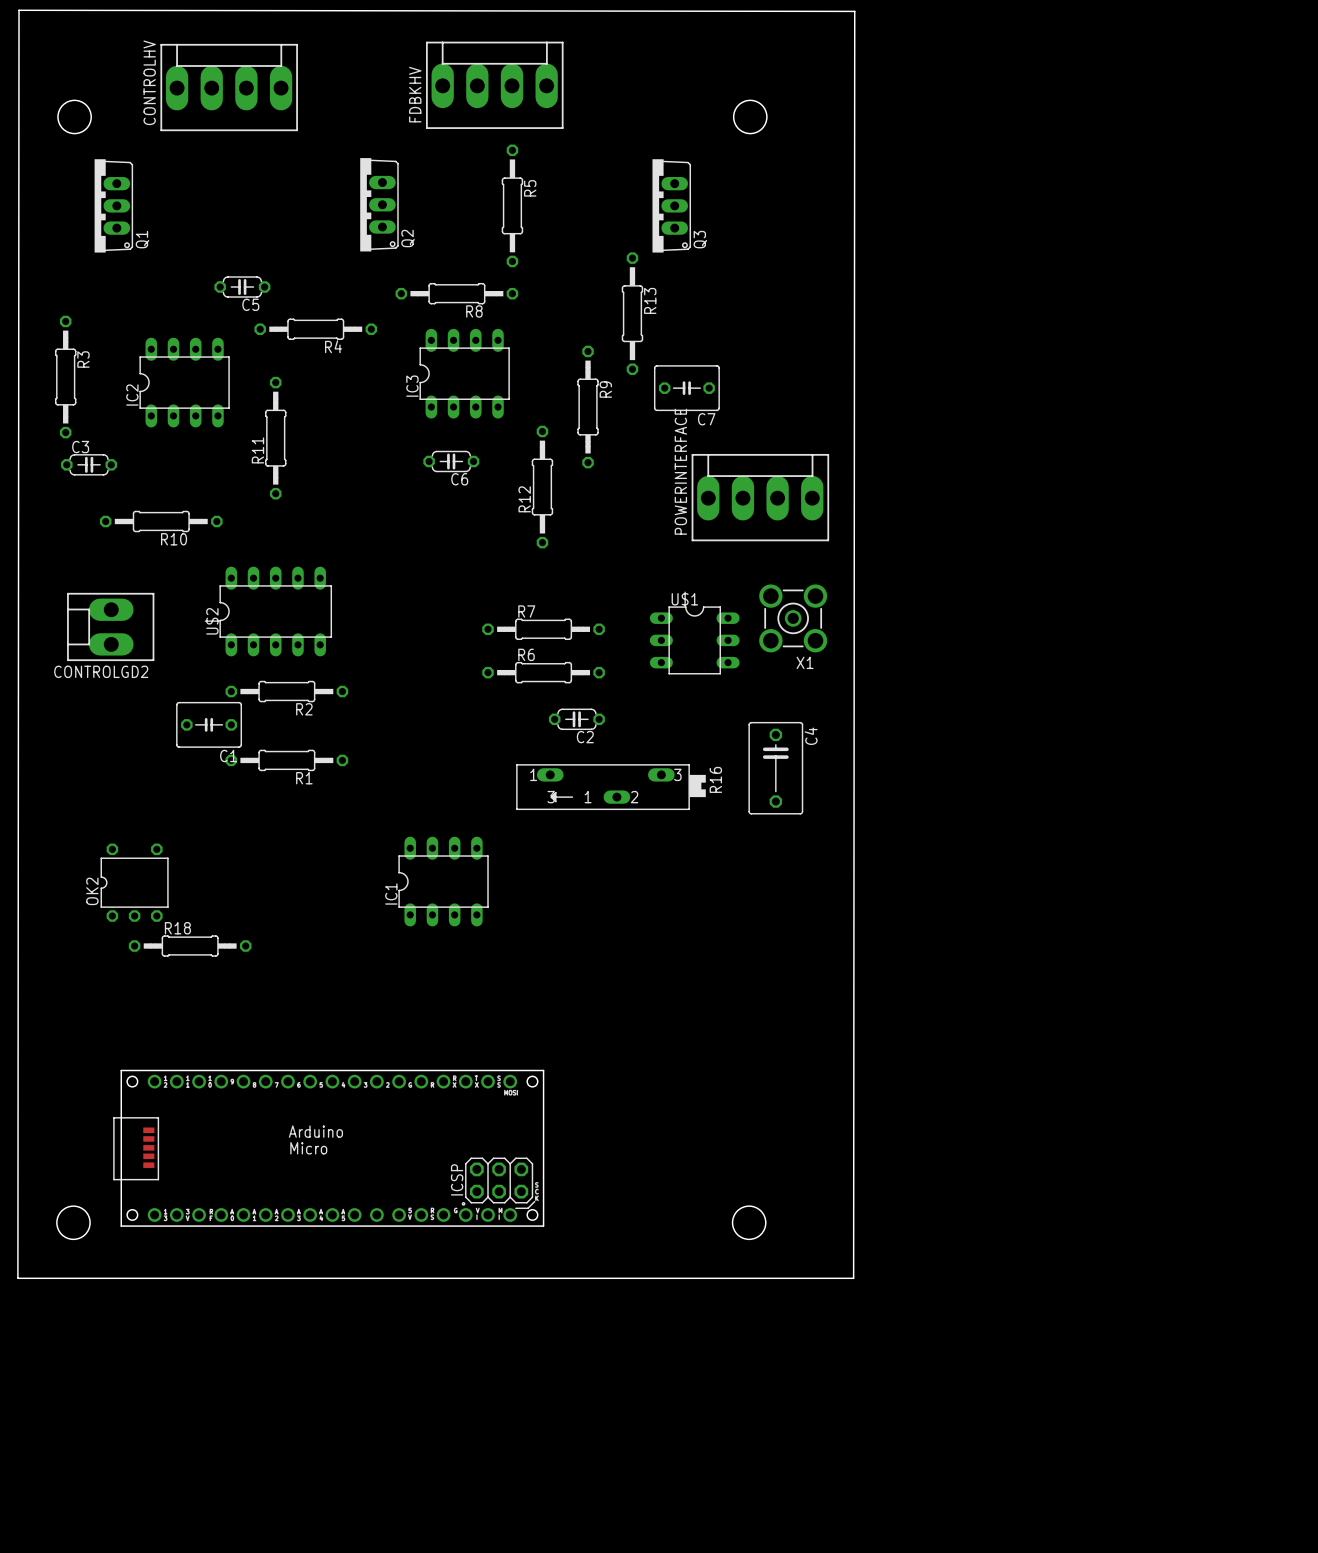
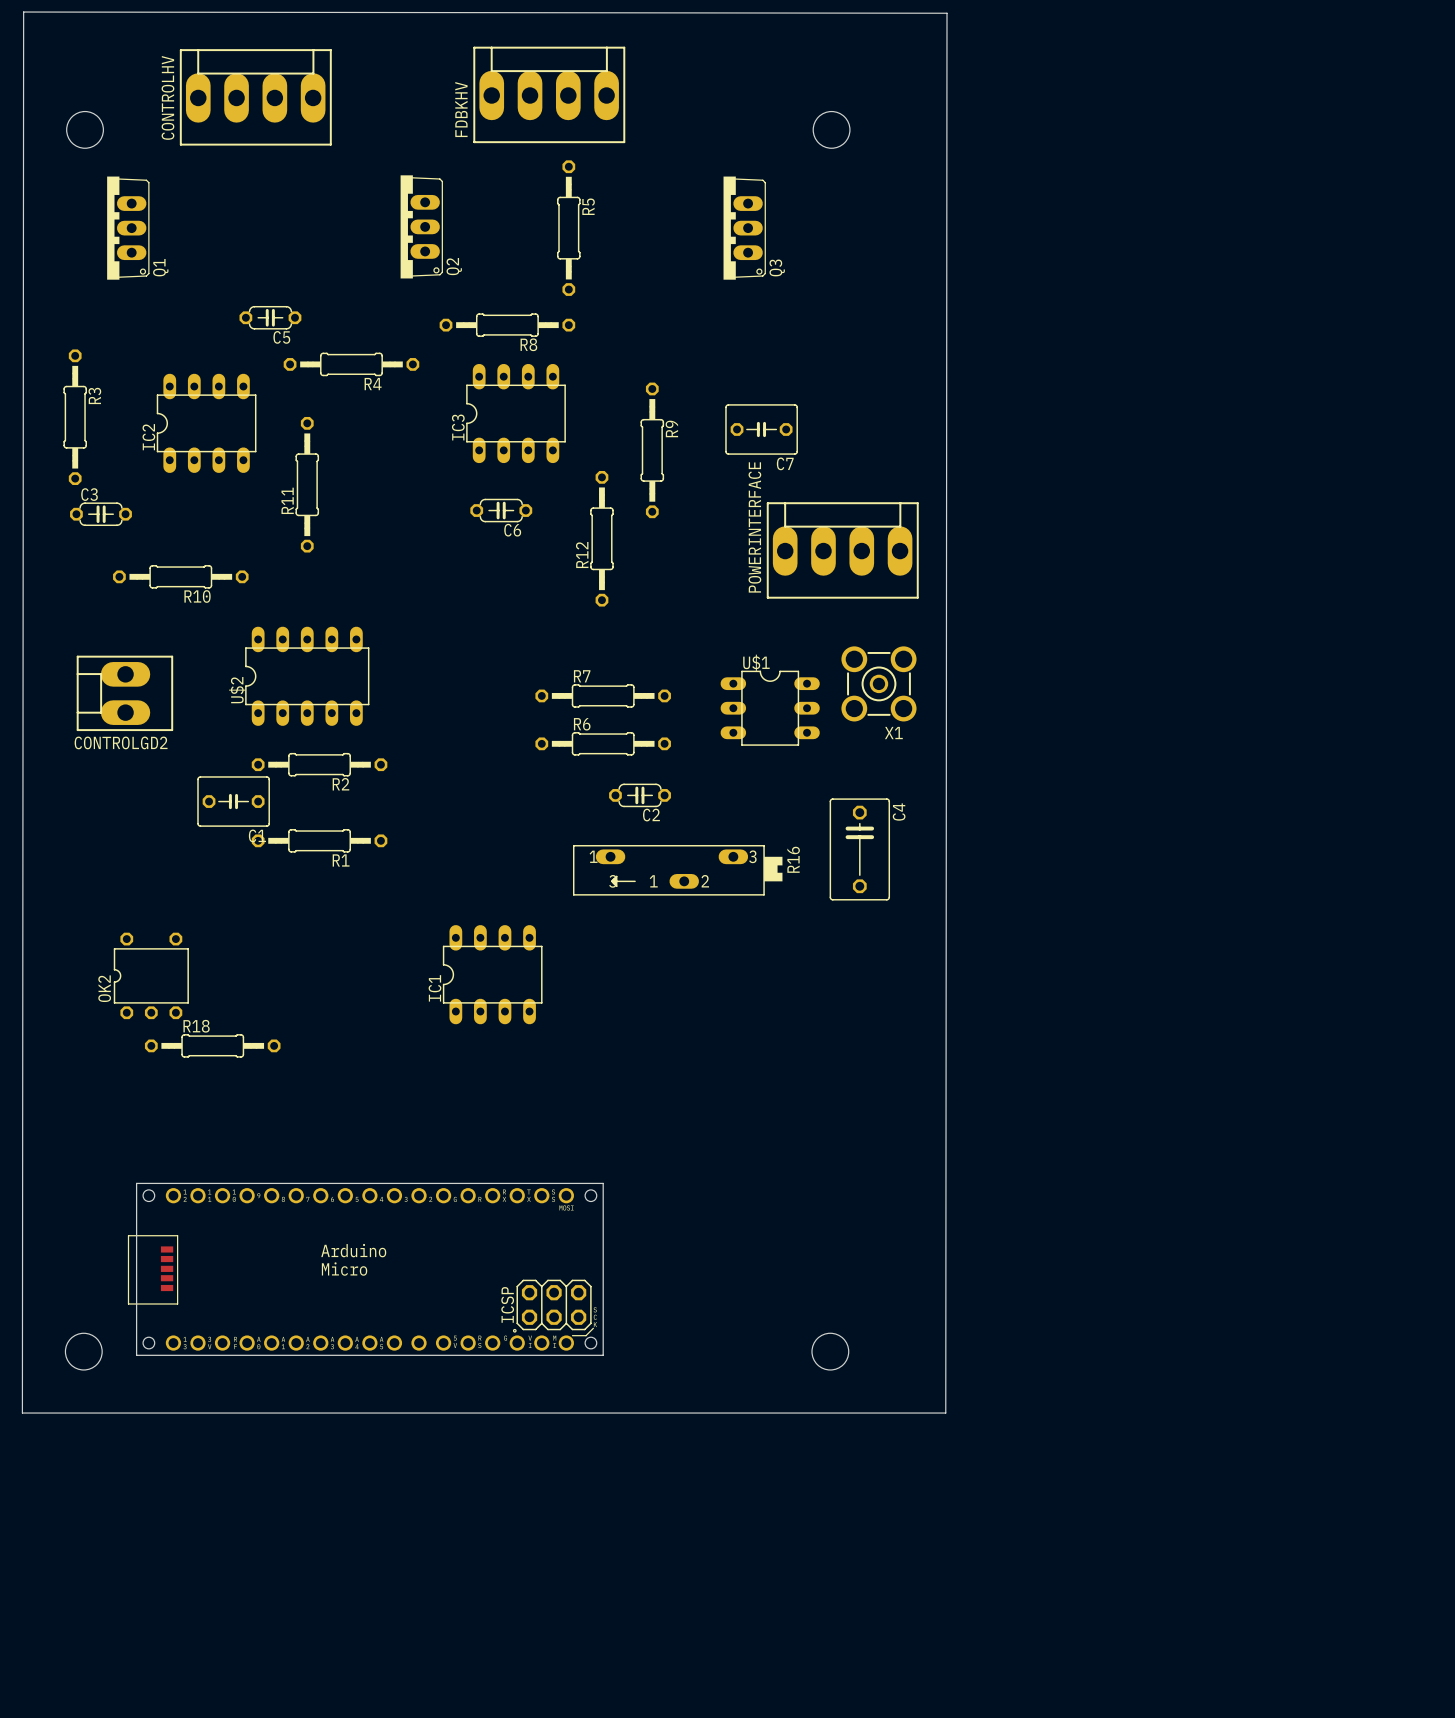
R13: (632, 313) -> none

